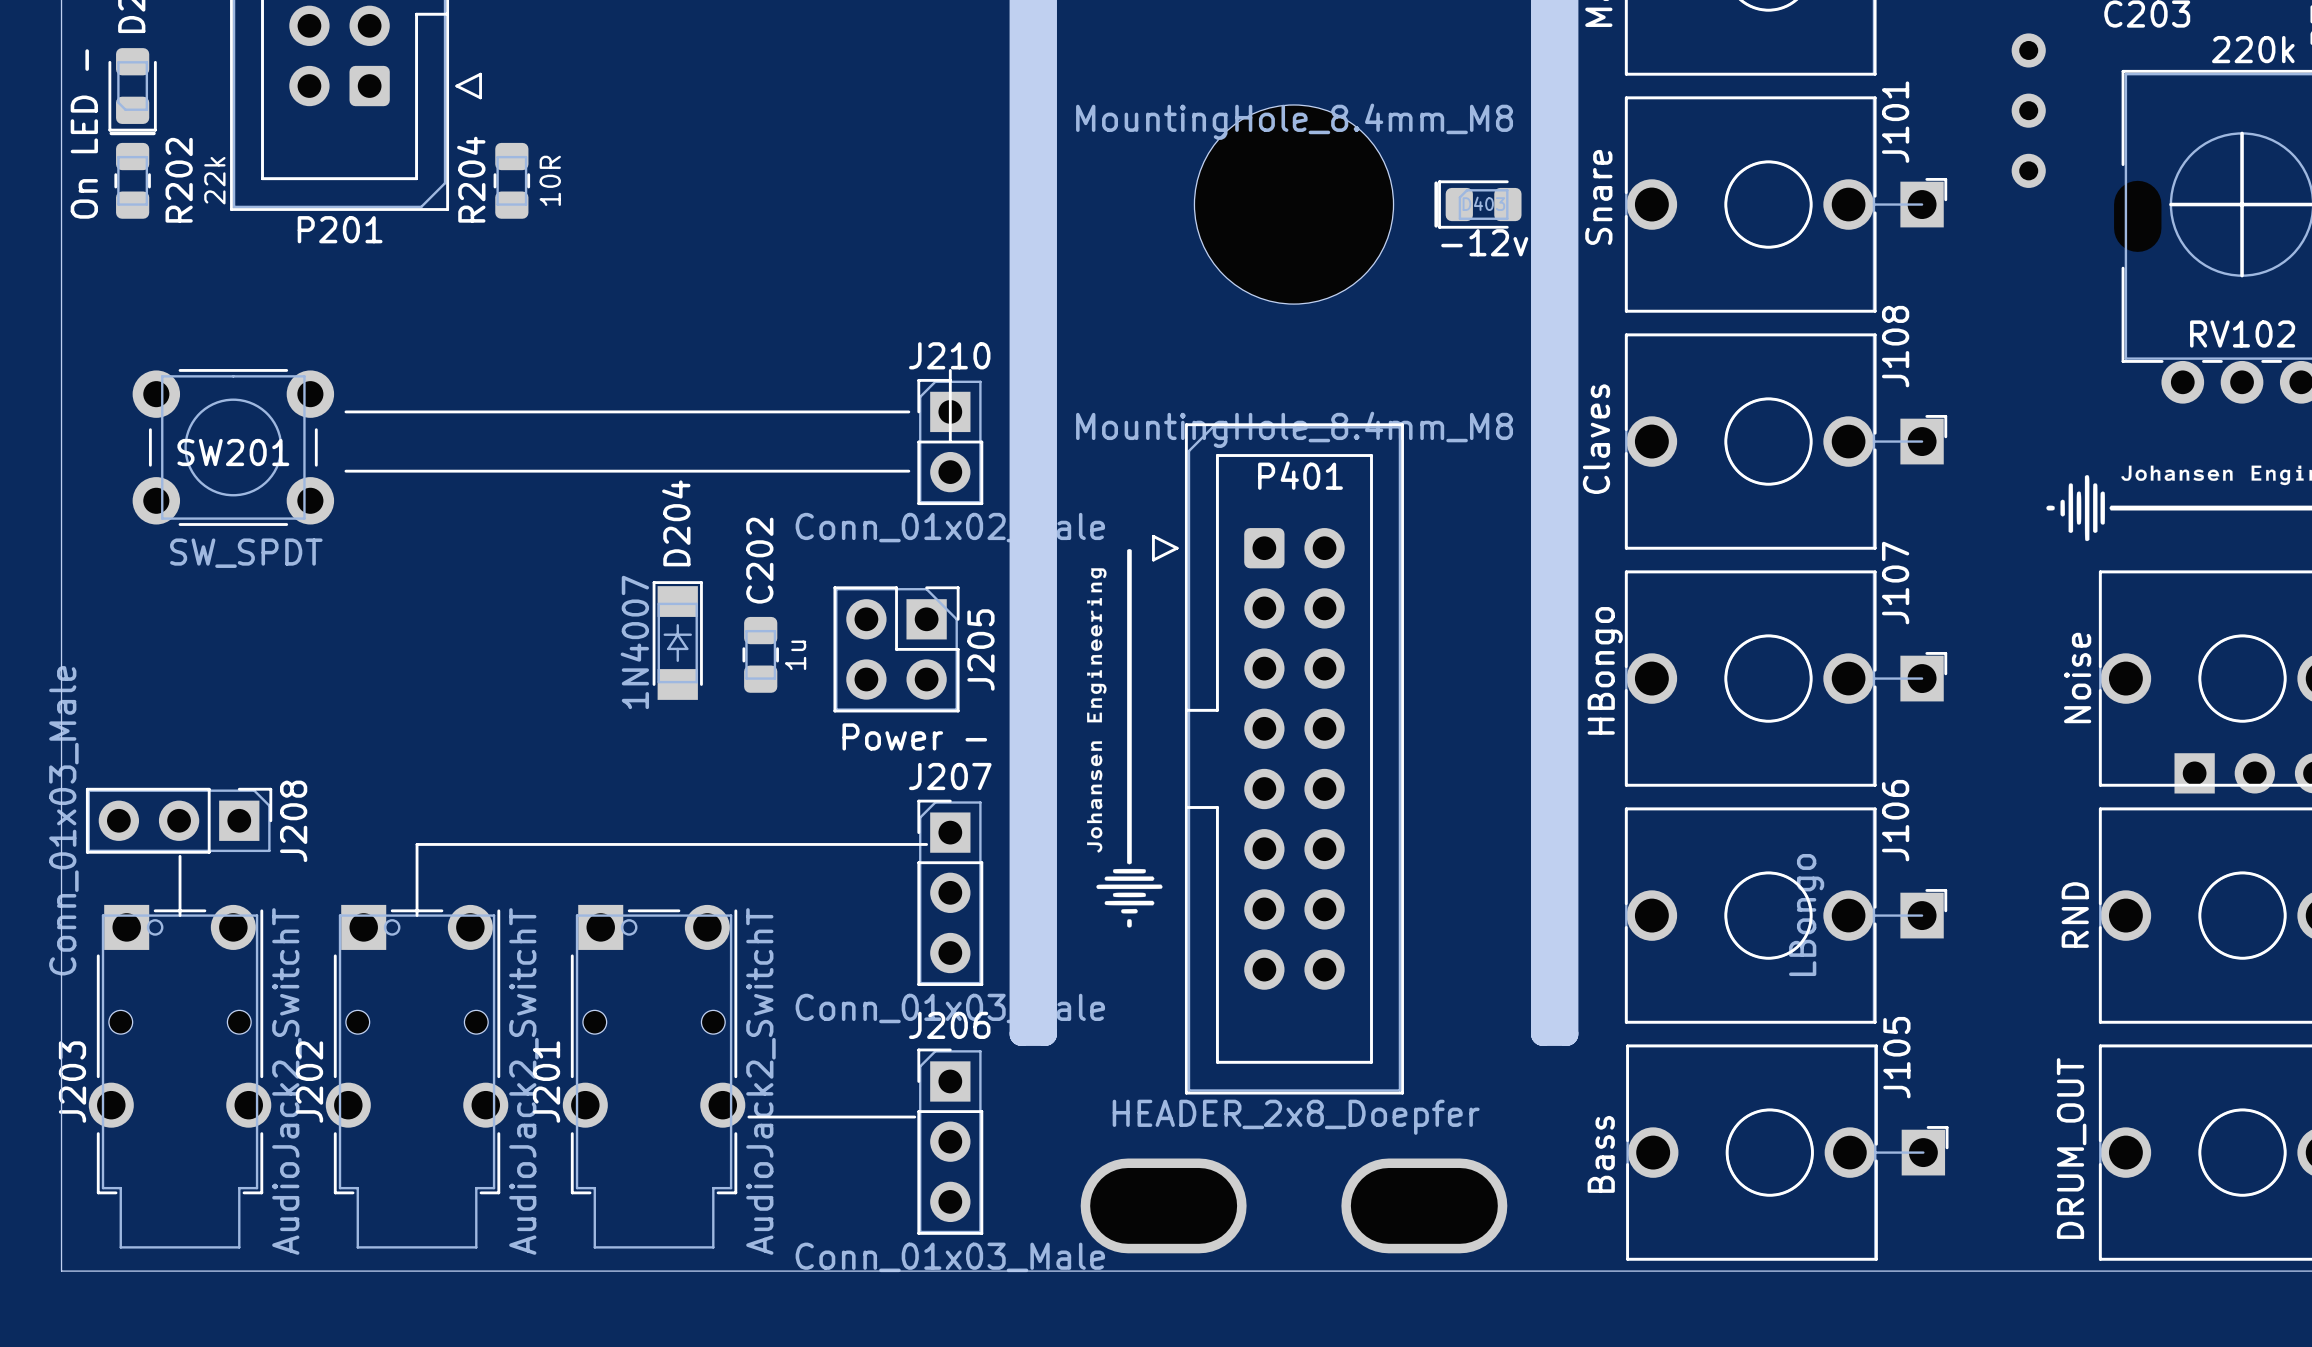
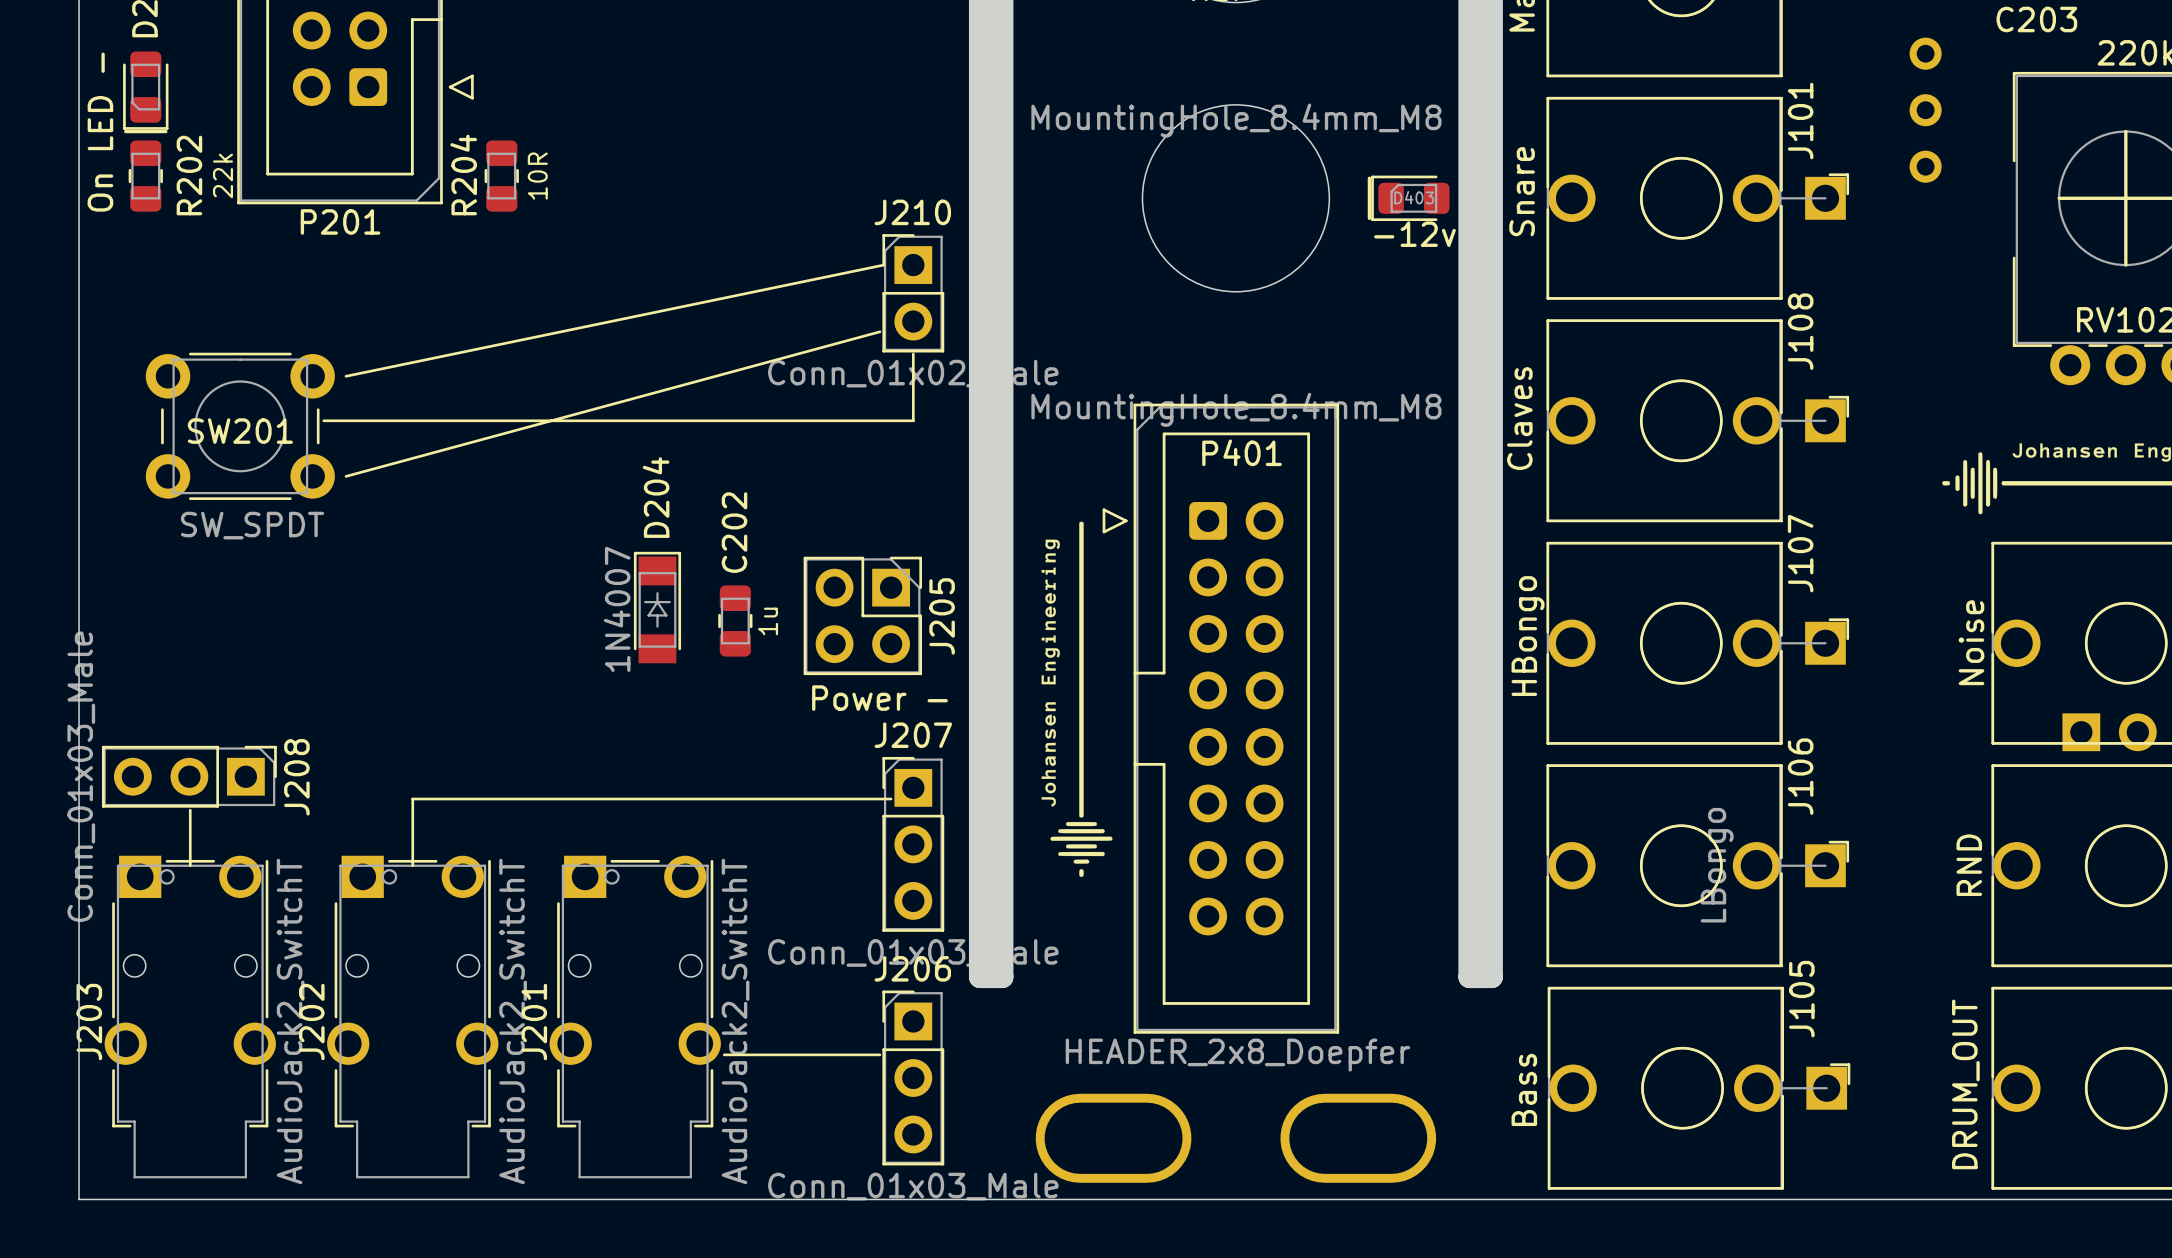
line: none -> (883, 265) (346, 376)
line: none -> (879, 331) (346, 476)
line: (345, 411) (908, 411) -> none
line: none -> (323, 420) (913, 420)
J210 position: (950, 442) -> (913, 293)
line: (345, 471) (908, 471) -> none

